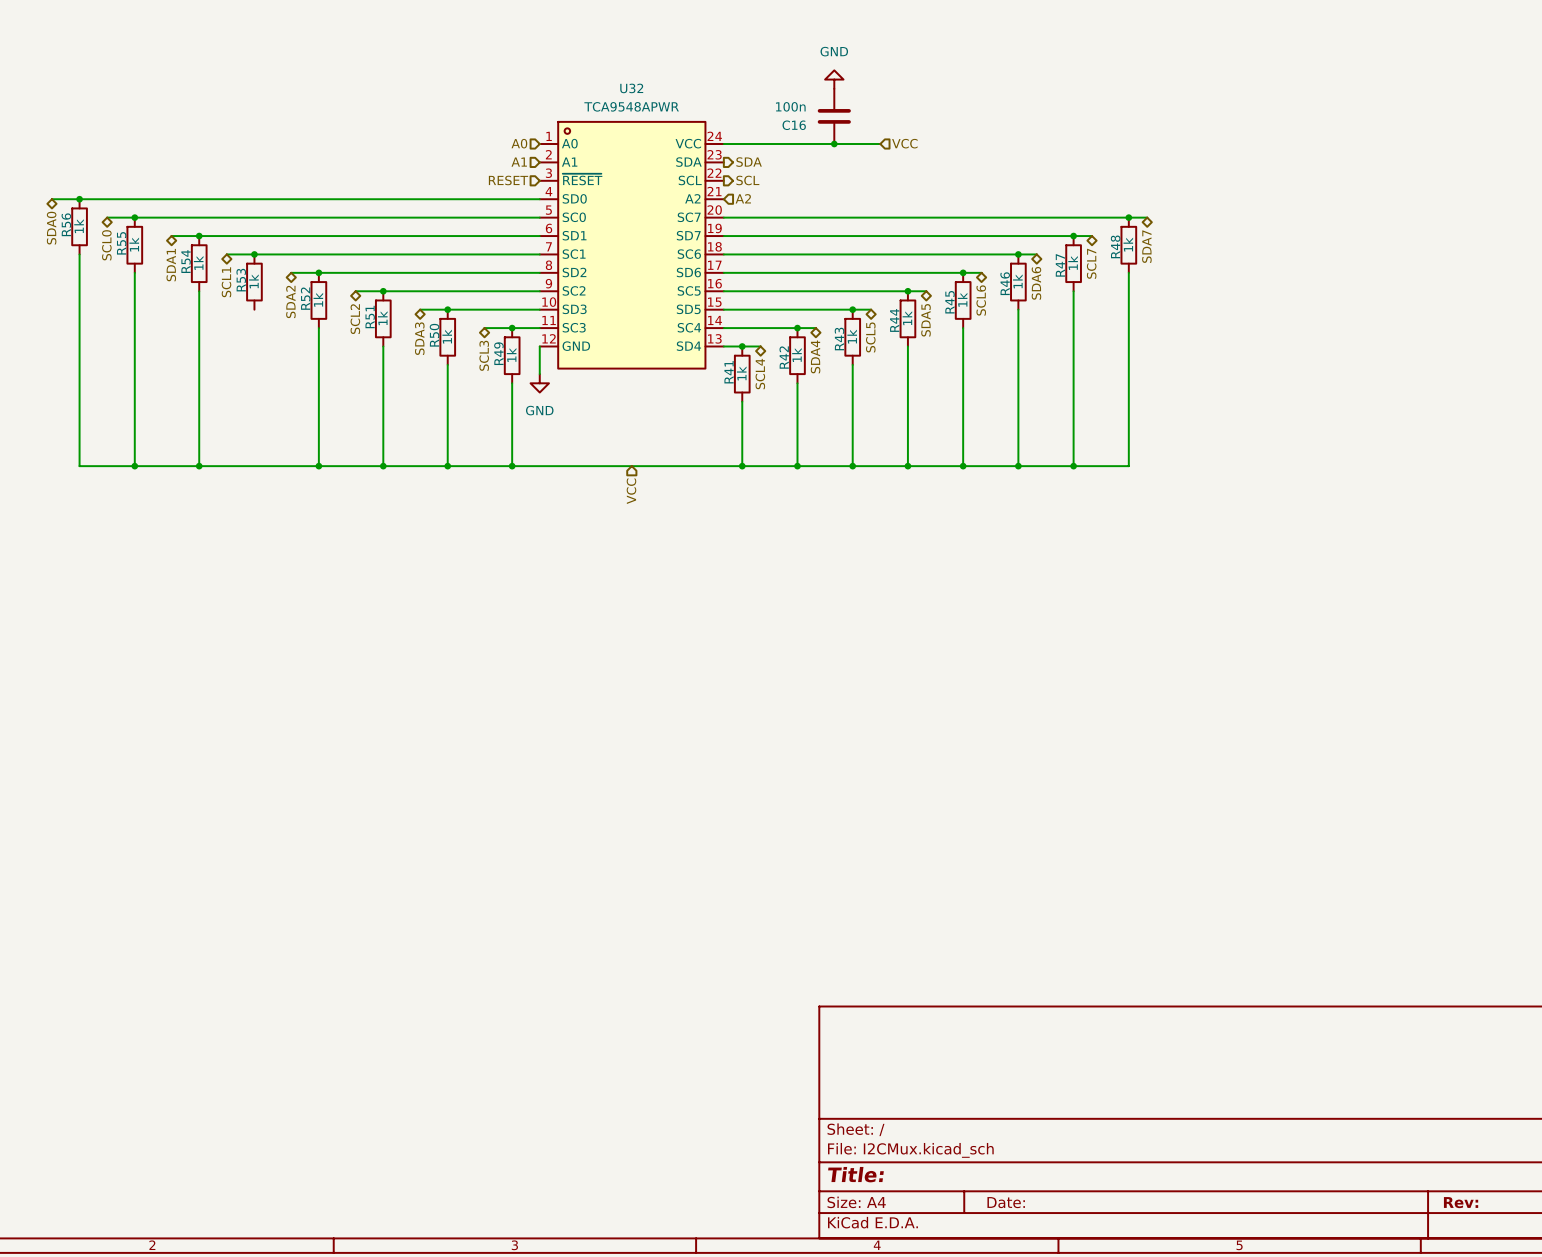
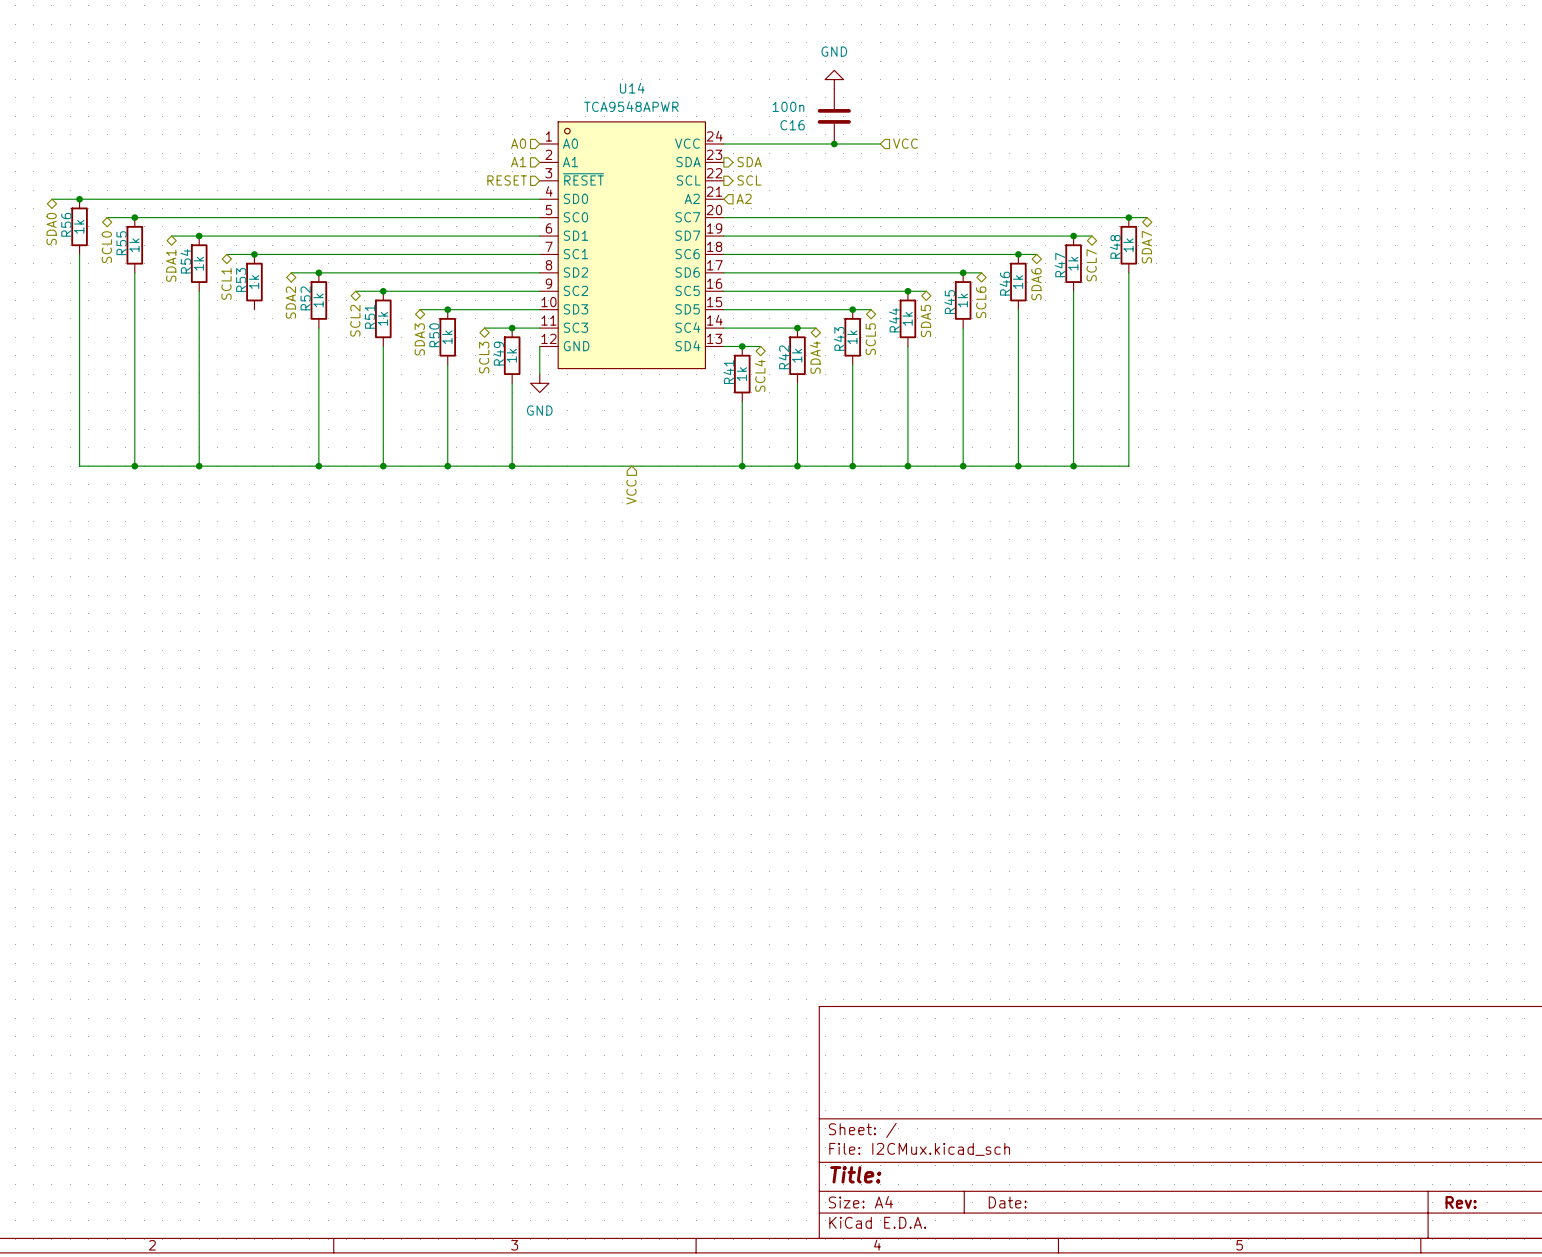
U32 name: U32 (631, 88) -> U14 (632, 88)

